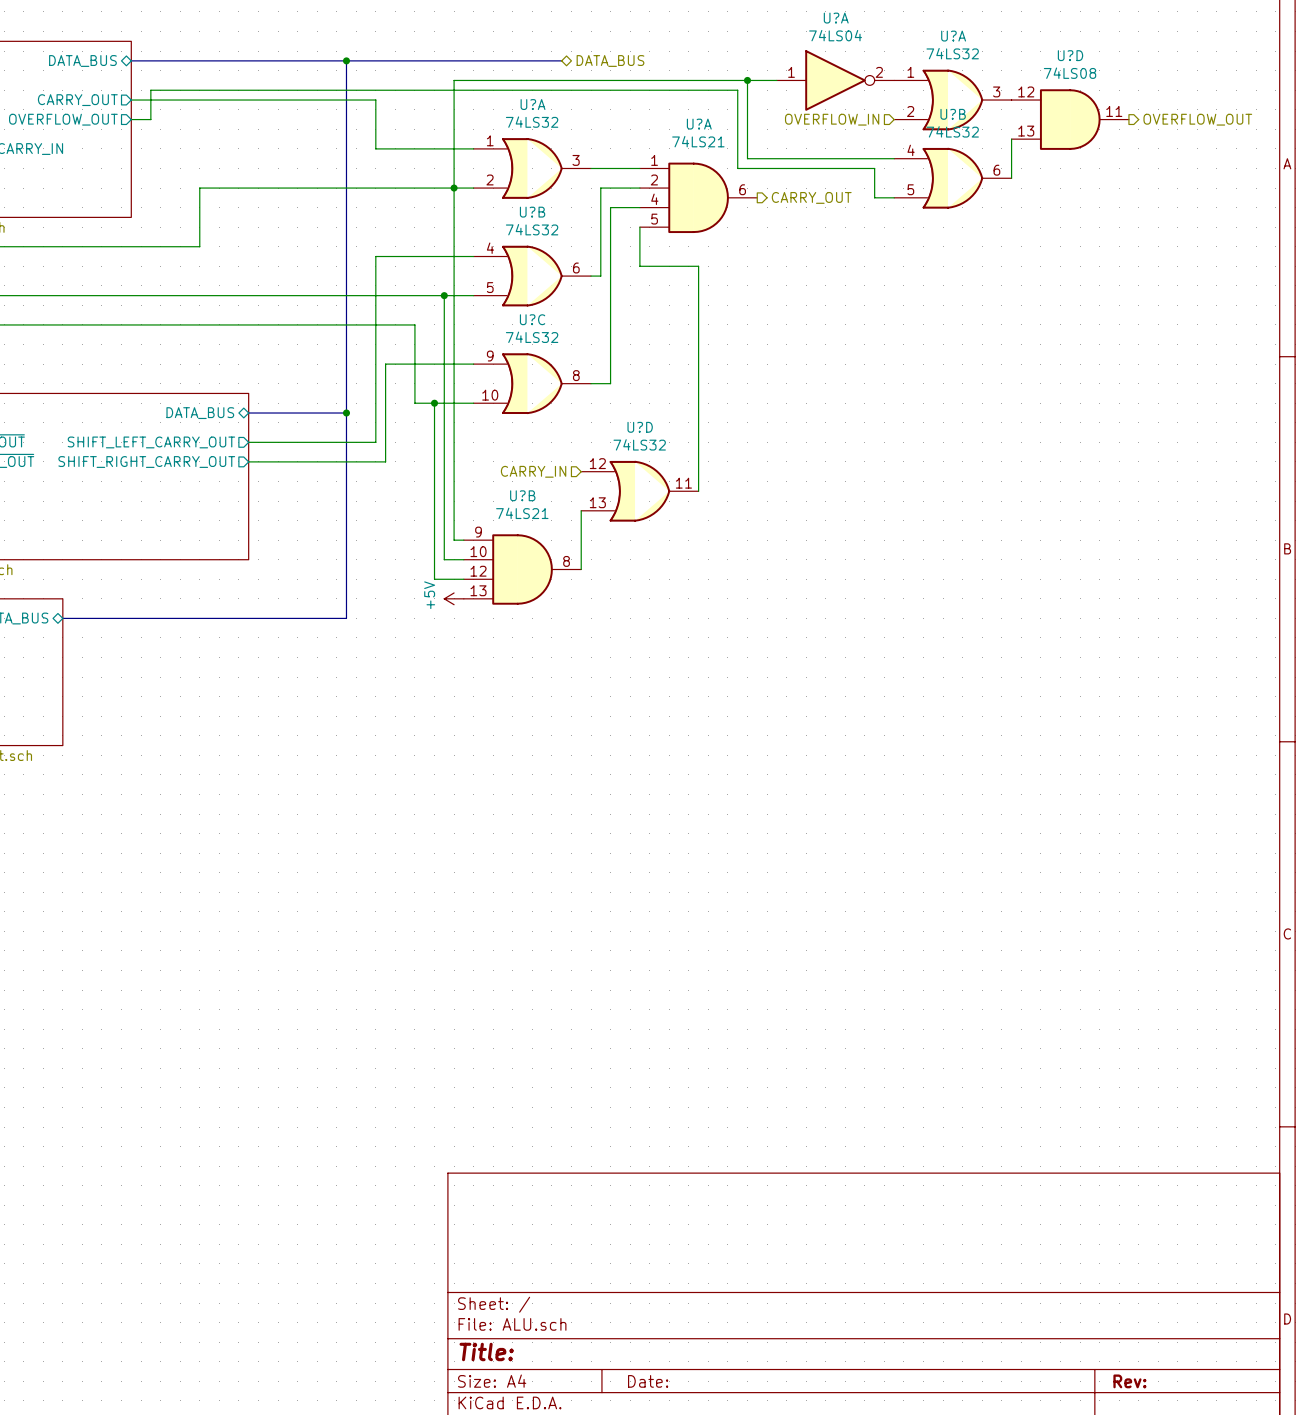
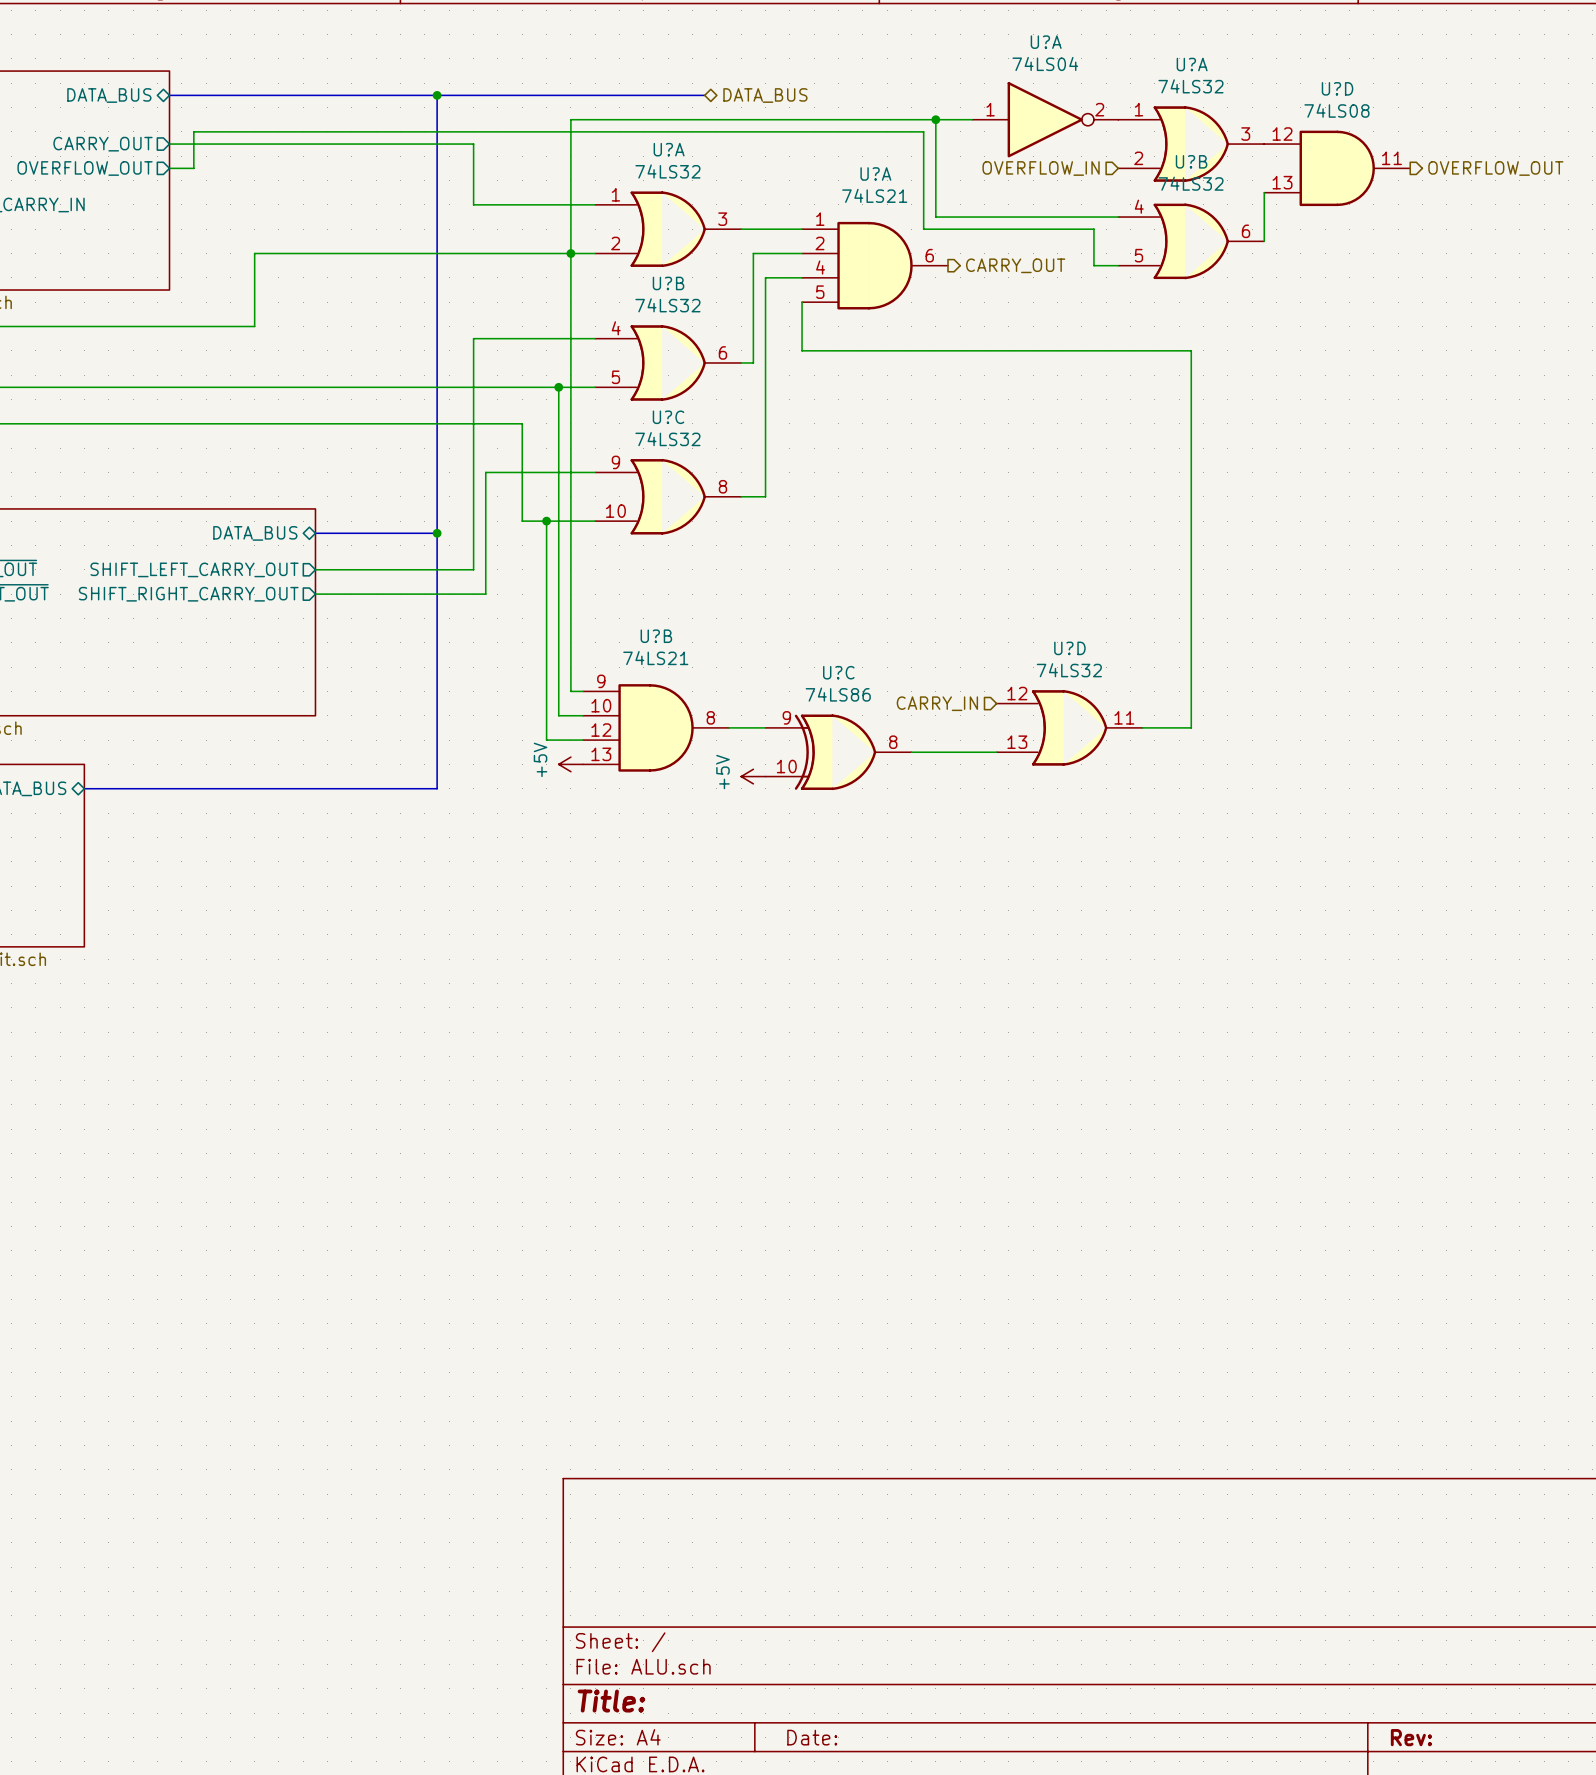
wire: (698, 266) (698, 491) -> (875, 350) (1191, 350) (1191, 727) (1142, 727)
hierarchical label: CARRY_IN (533, 471) -> none
U?D: 74LS32 (639, 491) -> none
wire: (581, 510) (581, 569) -> (765, 727) (729, 727)
hierarchical label: none -> CARRY_IN (937, 703)
U?D: none -> 74LS32 (1069, 727)
U?C: none -> 74LS86 (838, 752)
wire: none -> (911, 752) (996, 752)
power symbol: none -> +5V (753, 776)

